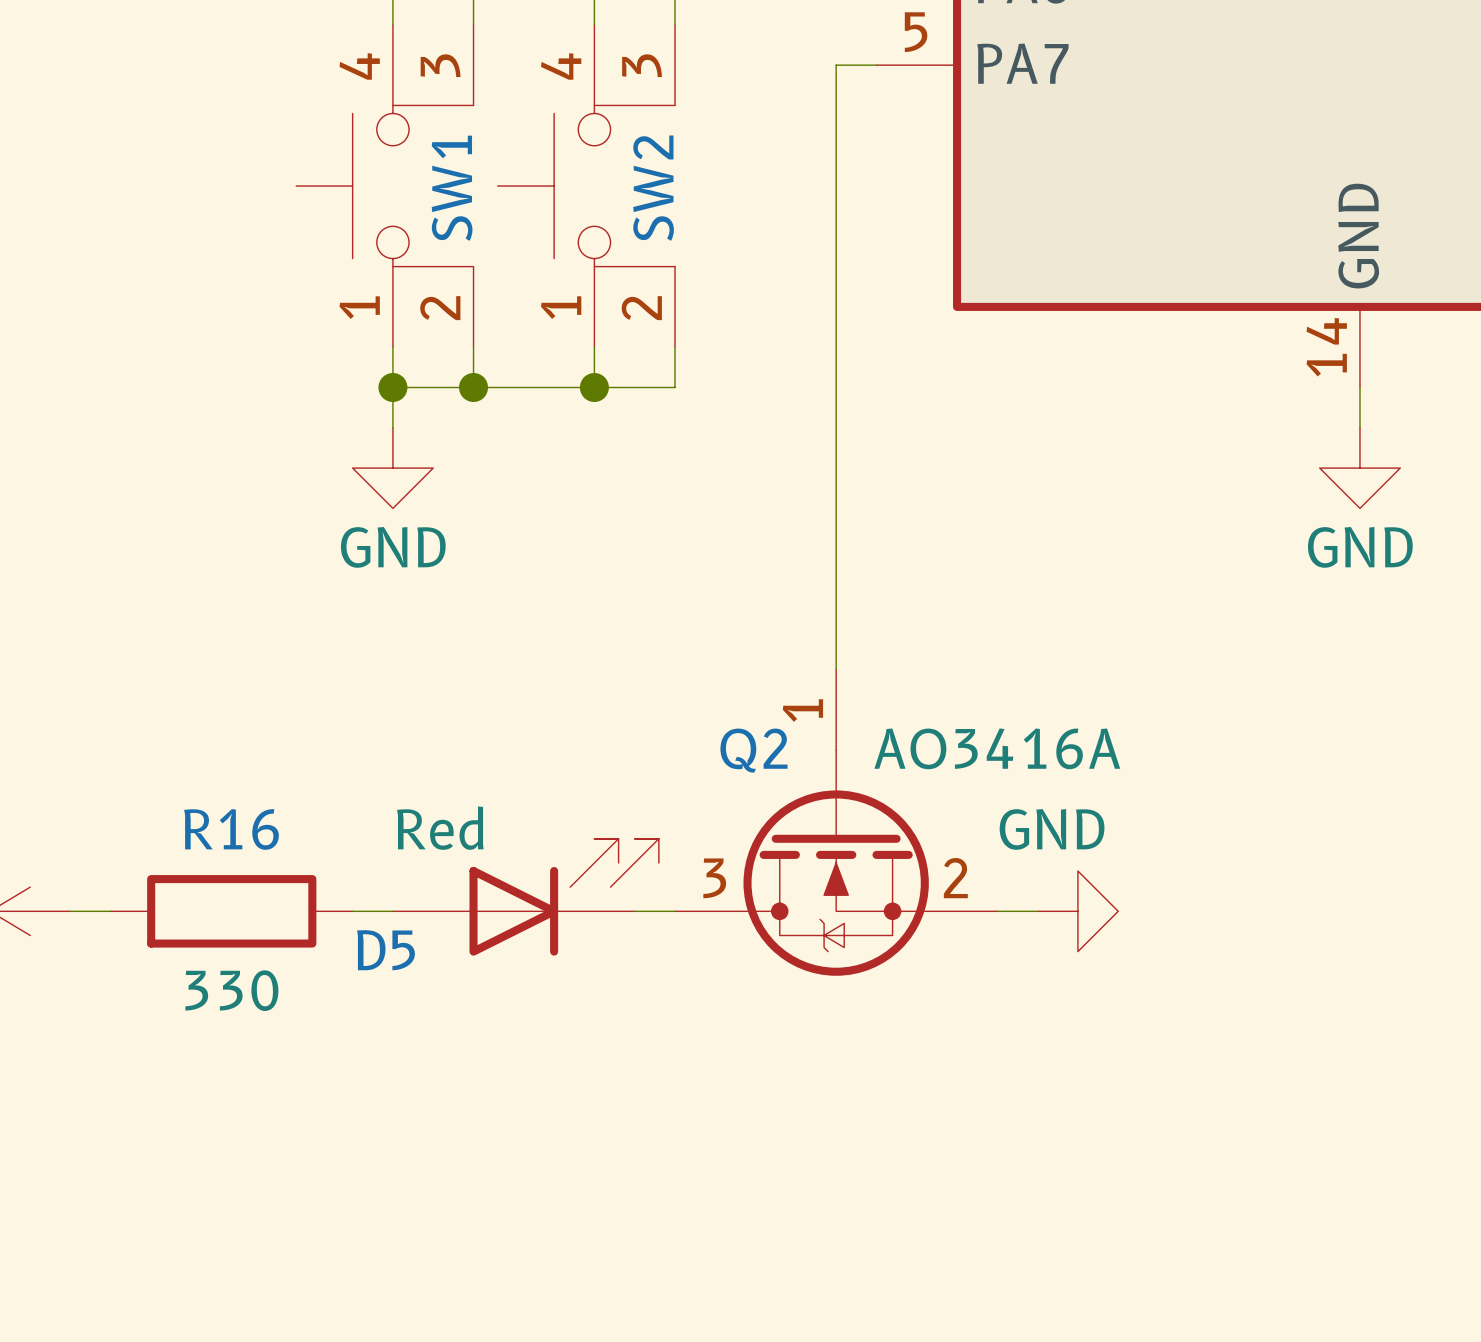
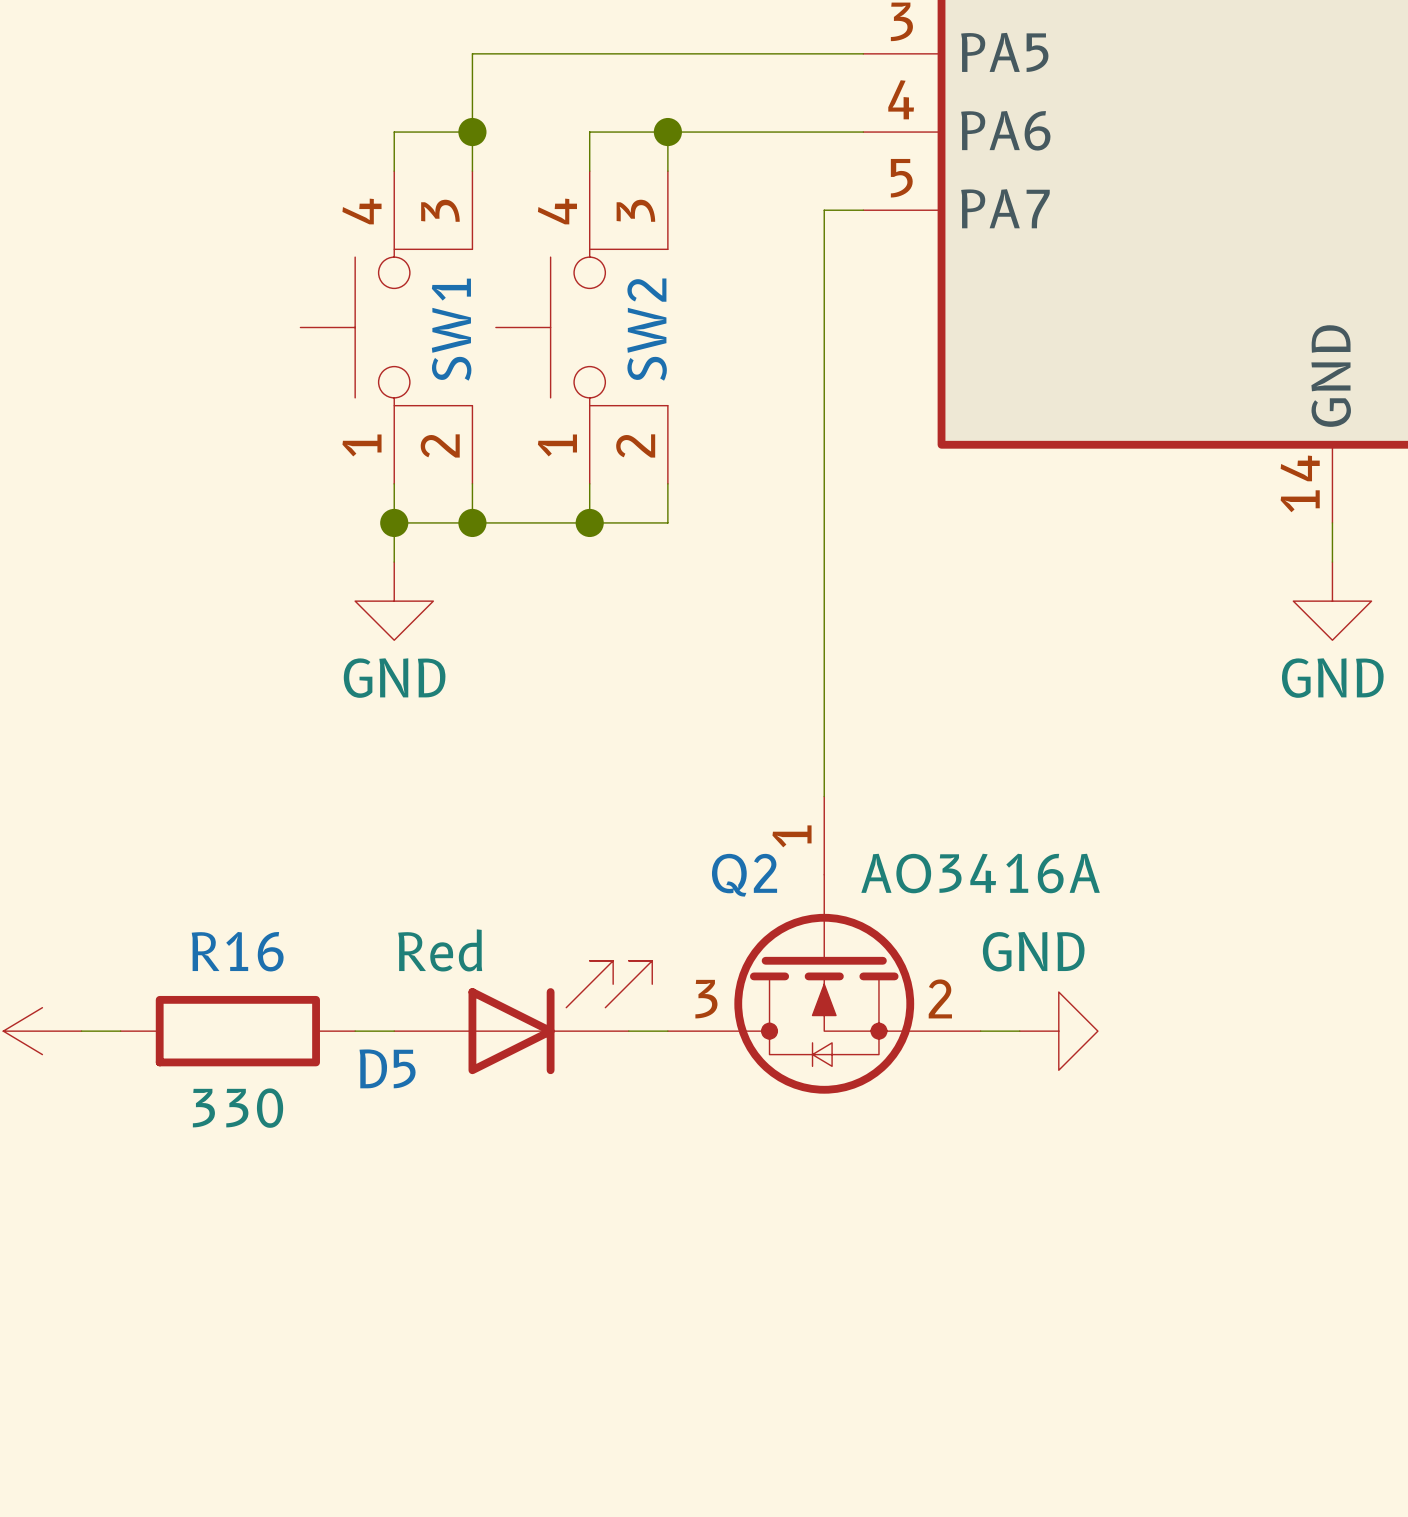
Q2 symbol: [674, 669, 998, 976] -> [667, 796, 981, 1094]

